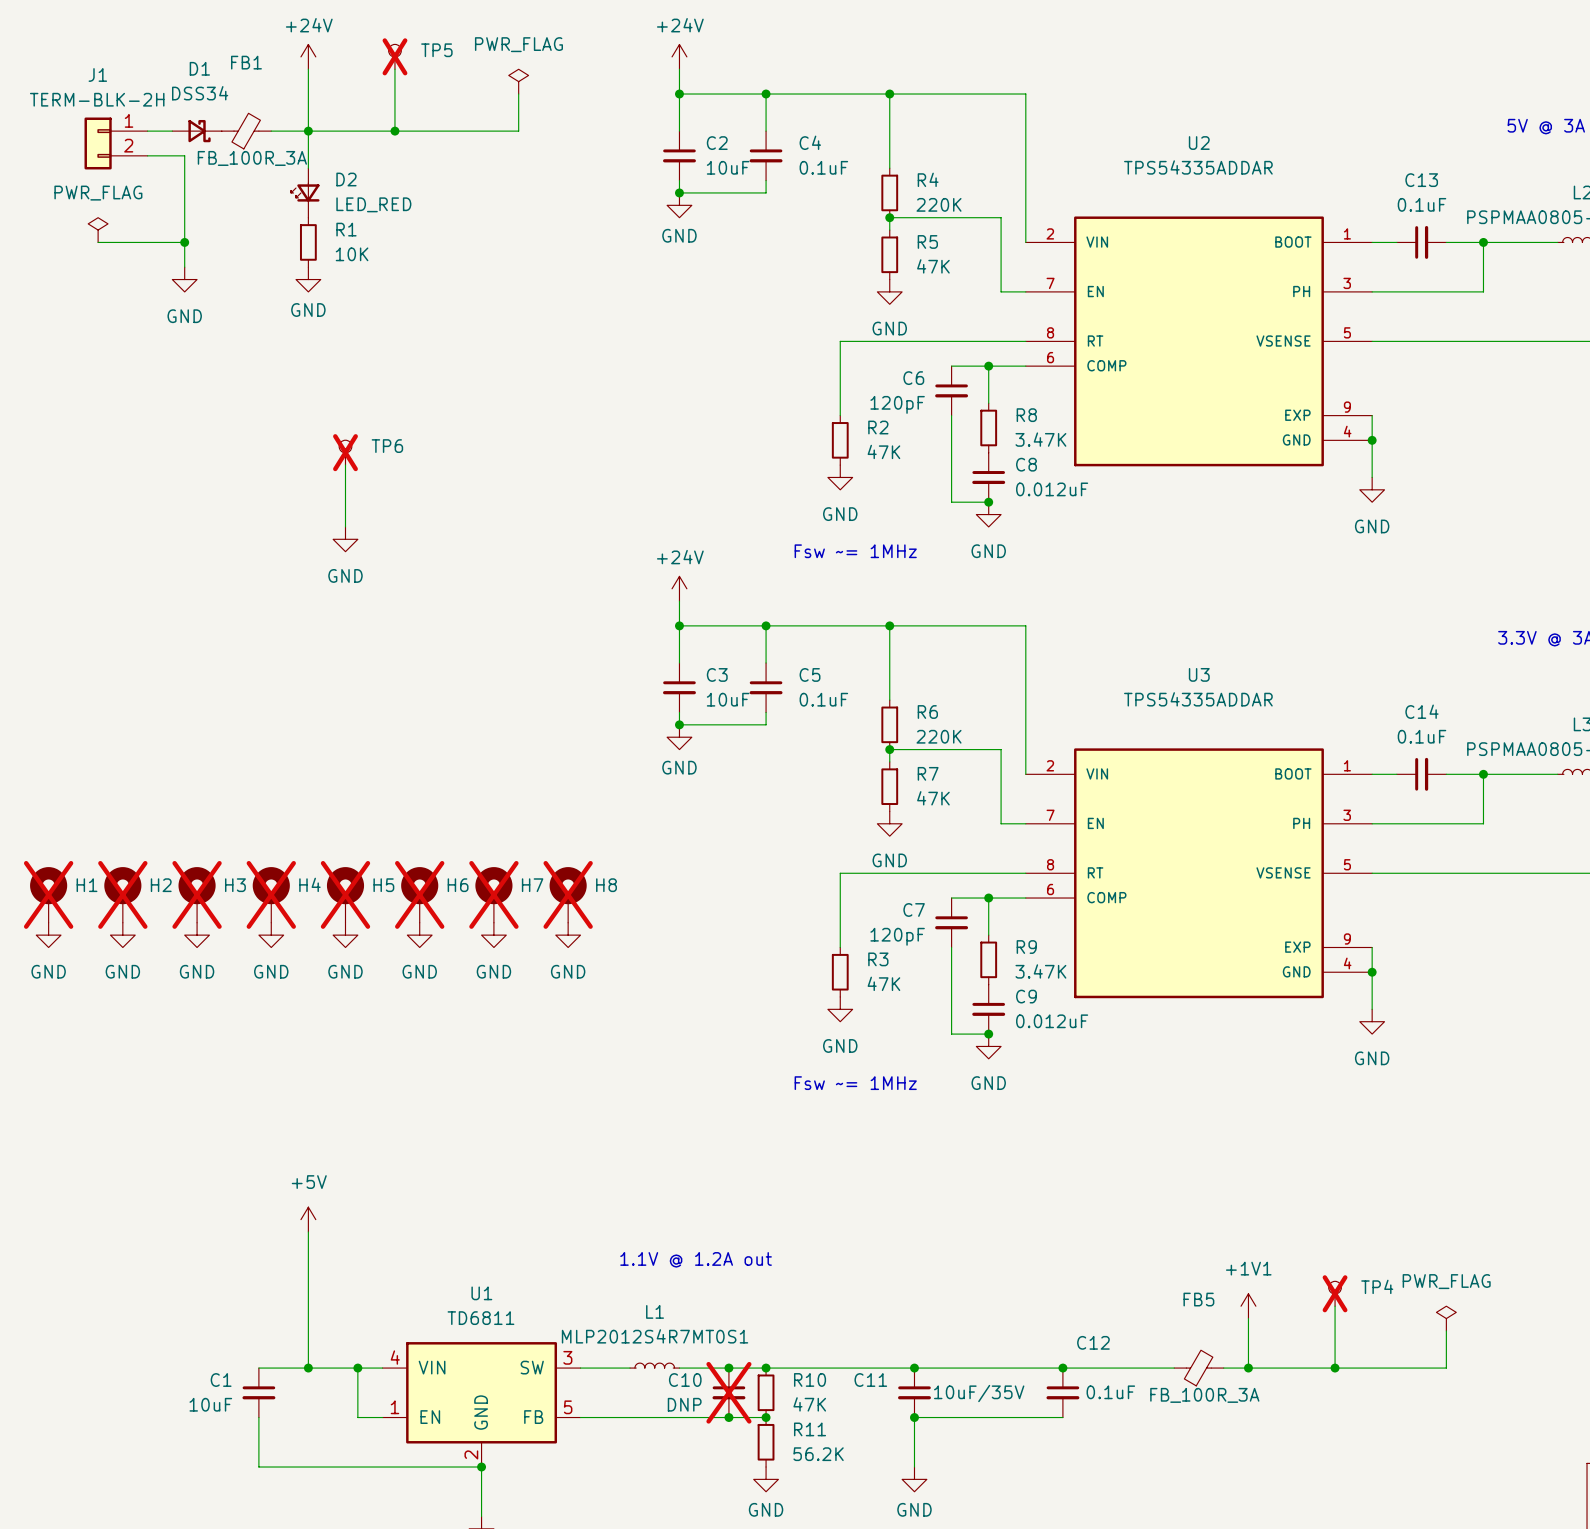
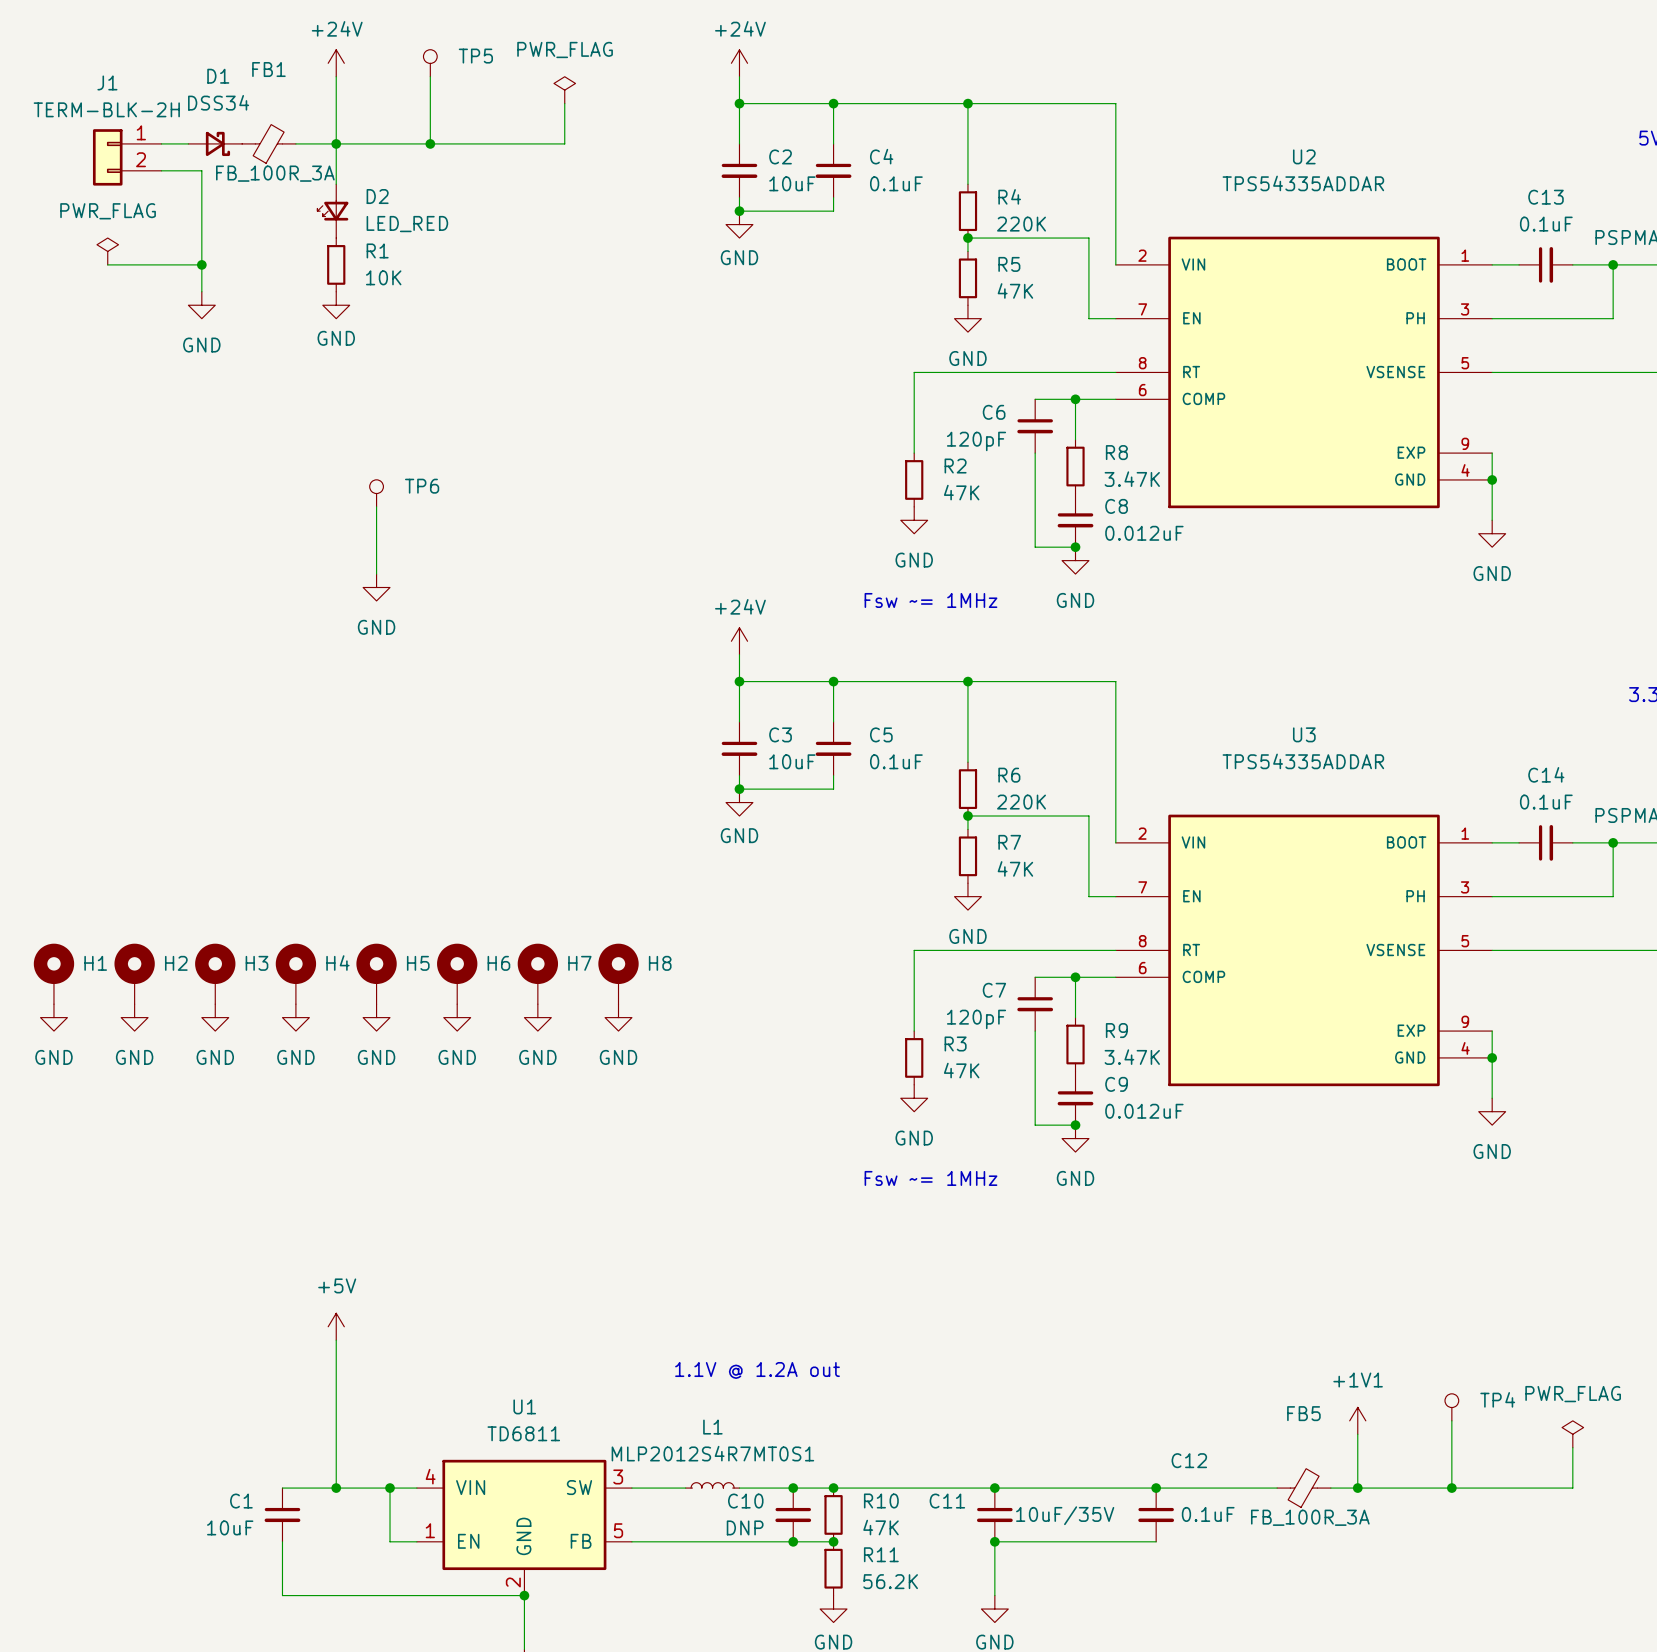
TP5 do-not-place cross: (394, 56) -> none
TP6 do-not-place cross: (345, 452) -> none
H1 do-not-place cross: (48, 894) -> none
H2 do-not-place cross: (122, 894) -> none
H3 do-not-place cross: (197, 894) -> none
H4 do-not-place cross: (271, 894) -> none
H5 do-not-place cross: (345, 894) -> none
H6 do-not-place cross: (419, 894) -> none
H7 do-not-place cross: (493, 894) -> none
H8 do-not-place cross: (568, 894) -> none
TP4 do-not-place cross: (1335, 1293) -> none
C10 do-not-place cross: (728, 1392) -> none

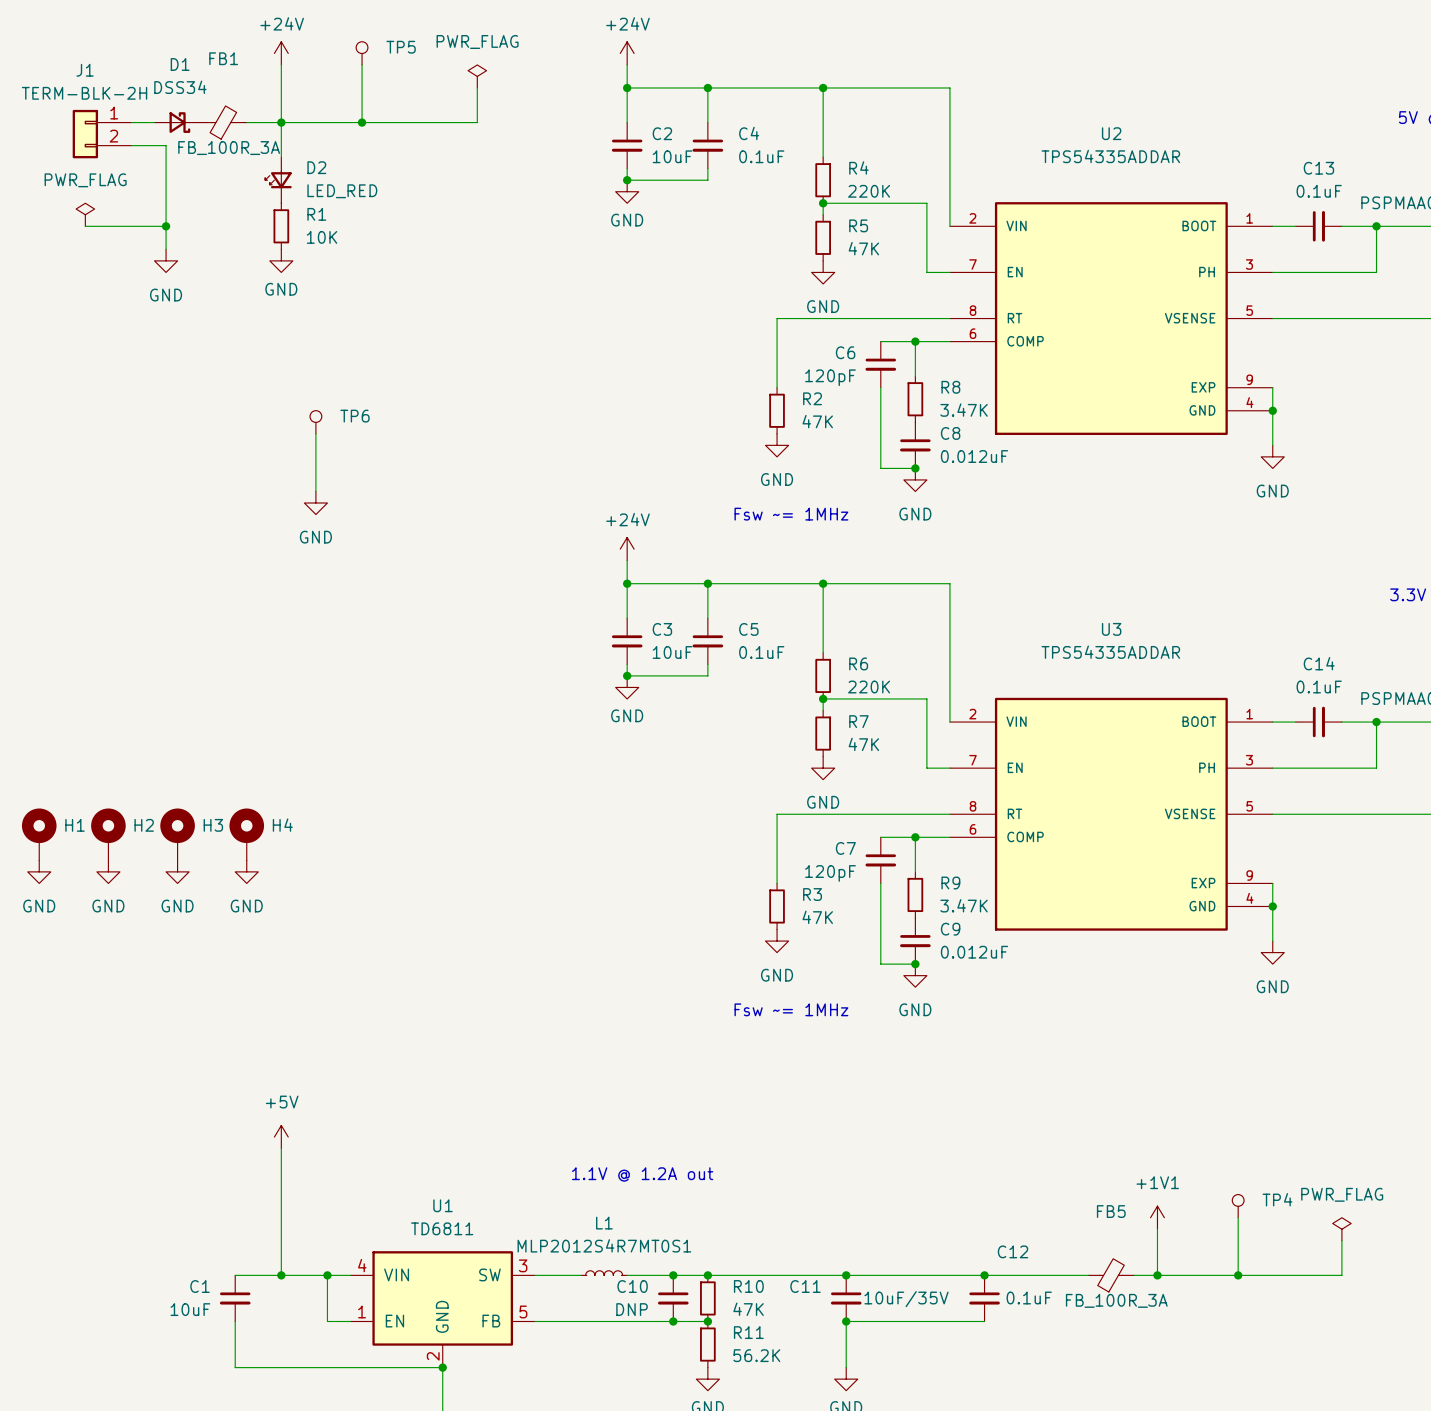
H5: (376, 973) -> none
H6: (457, 973) -> none
H7: (537, 973) -> none
H8: (618, 973) -> none
power symbol: GND (376, 1017) -> none
power symbol: GND (457, 1017) -> none
power symbol: GND (537, 1017) -> none
power symbol: GND (618, 1017) -> none

